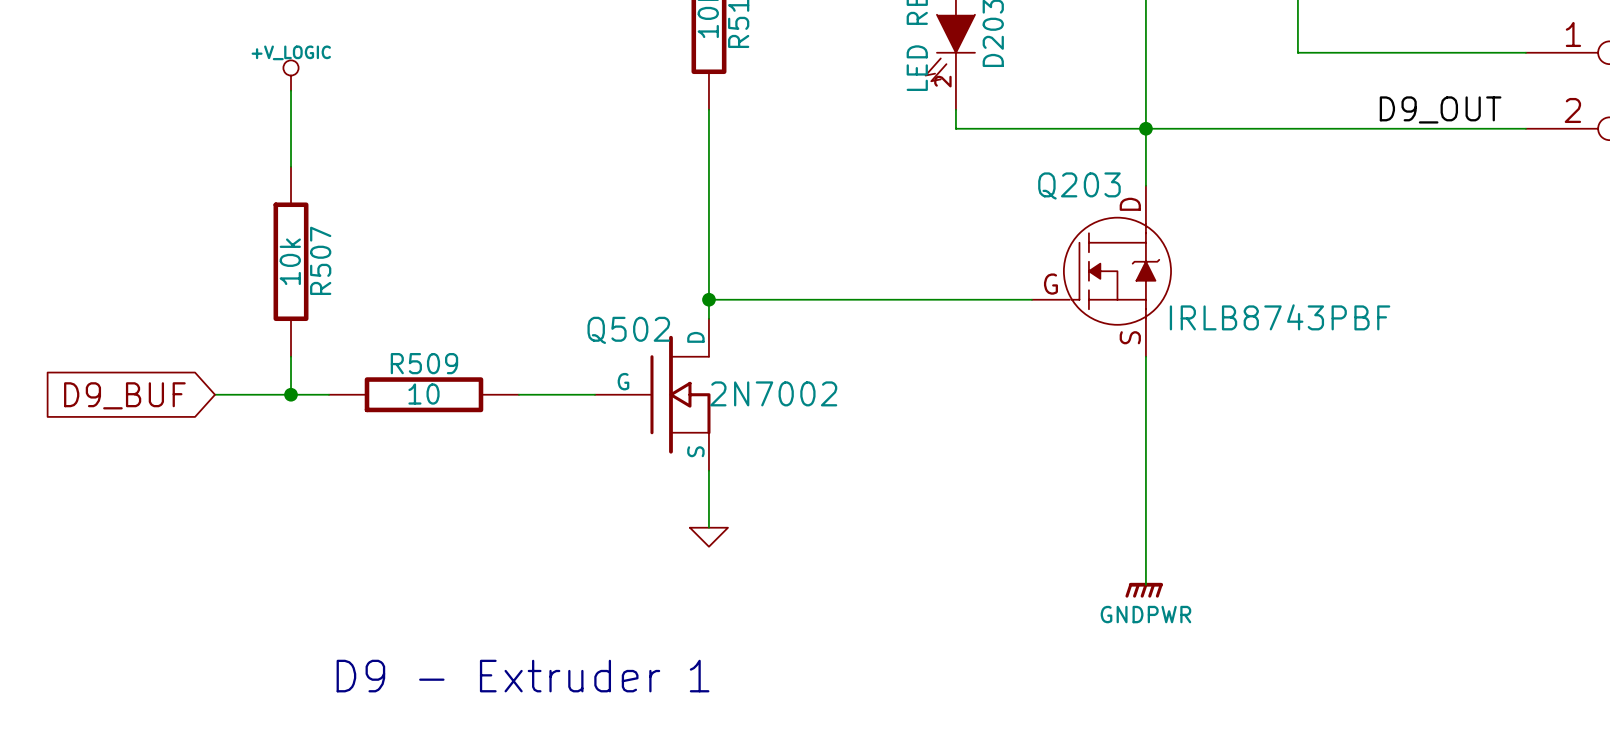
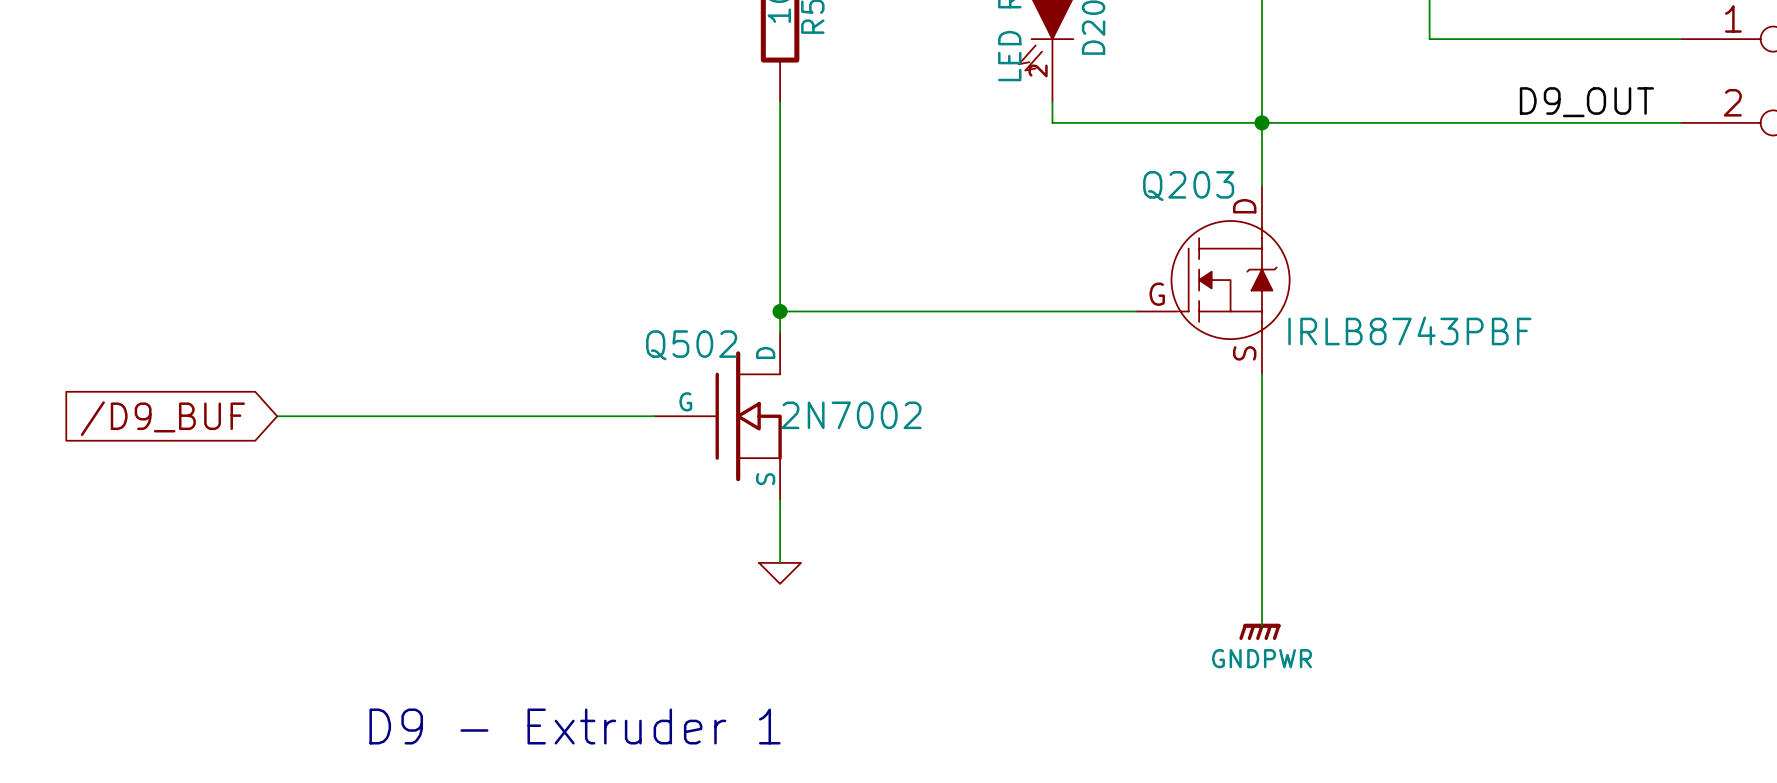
power symbol: +V_LOGIC (291, 75) -> none
wire: (291, 90) (291, 166) -> none
R507: 10k (291, 261) -> none
wire: (291, 356) (291, 394) -> none
wire: (215, 394) (253, 394) -> none
junction: (291, 394) -> none
wire: none -> (361, 416) (570, 416)
R509: 10 (423, 394) -> none
global label: D9_BUF (124, 395) -> /D9_BUF (162, 418)

